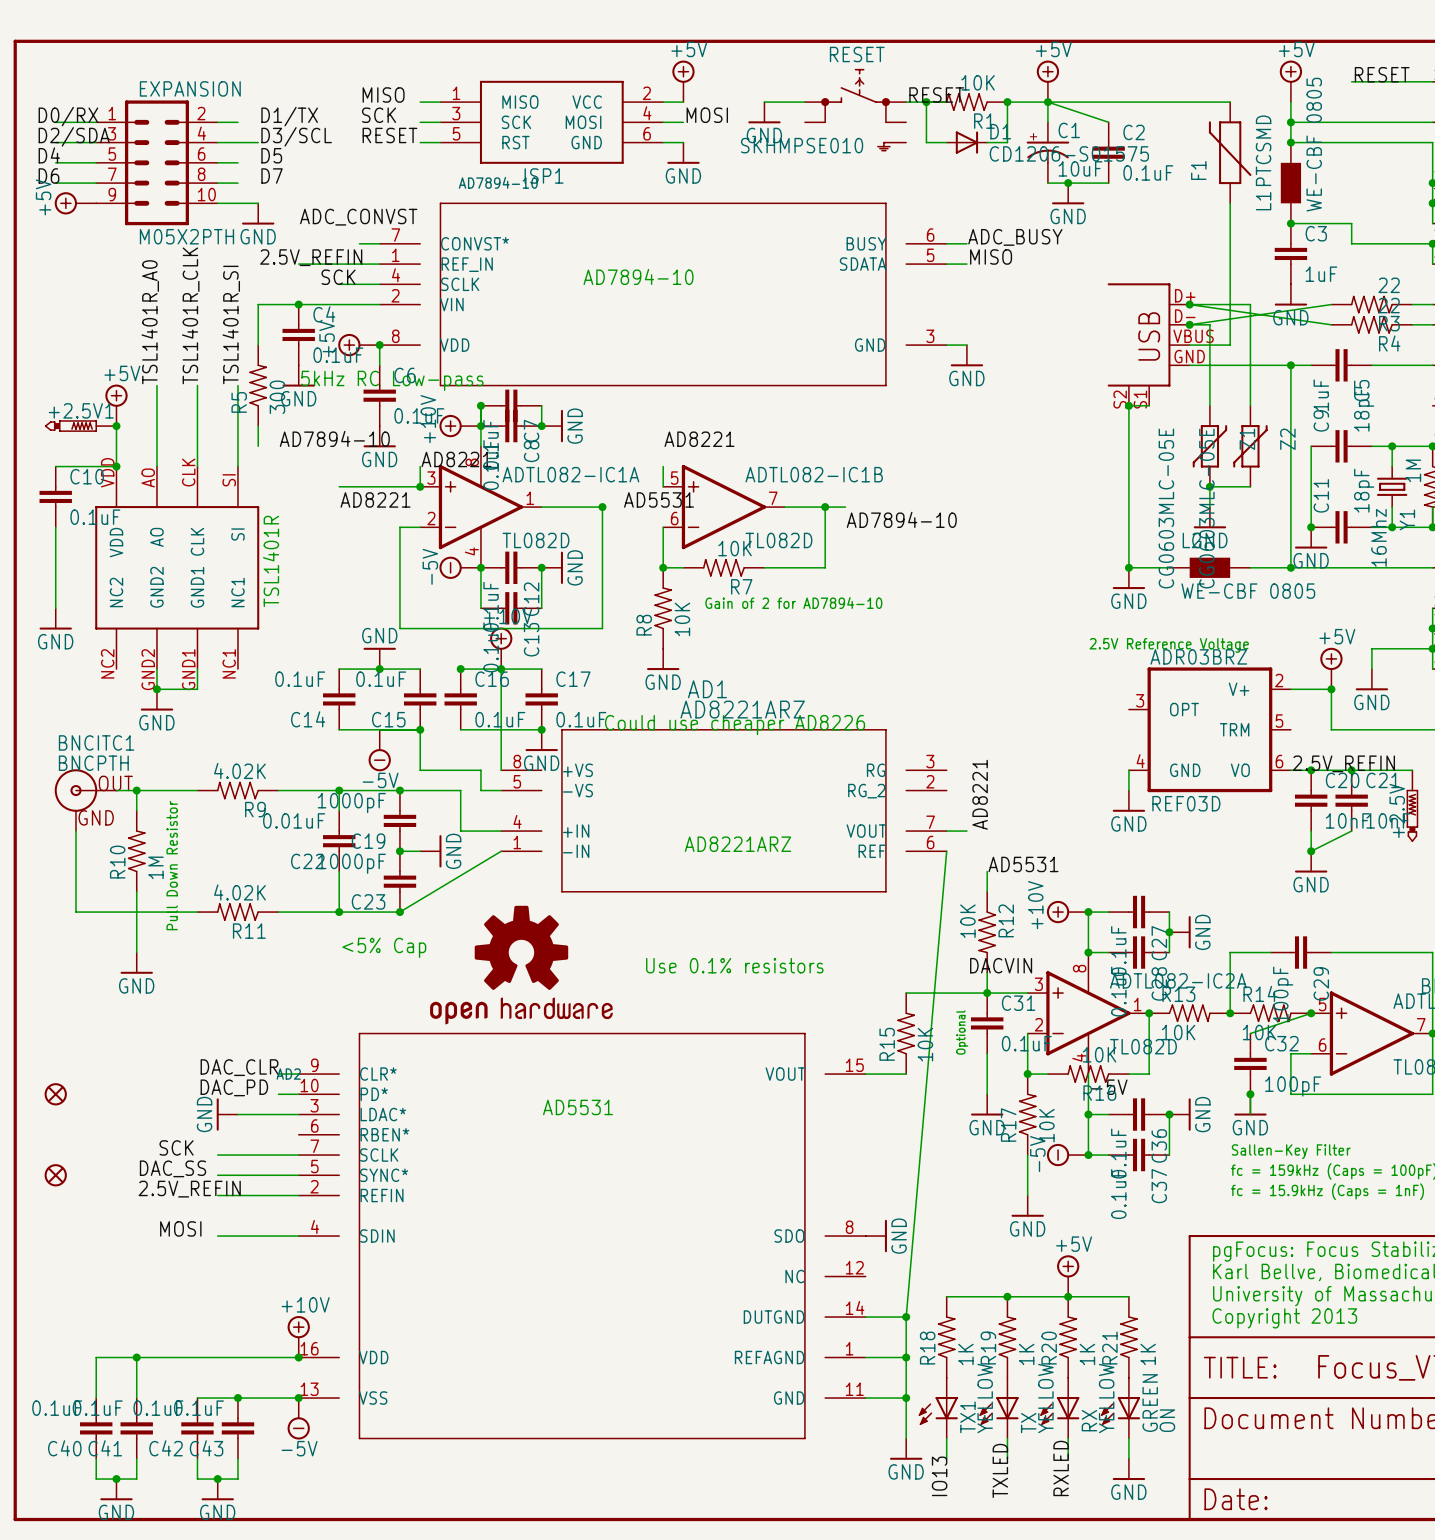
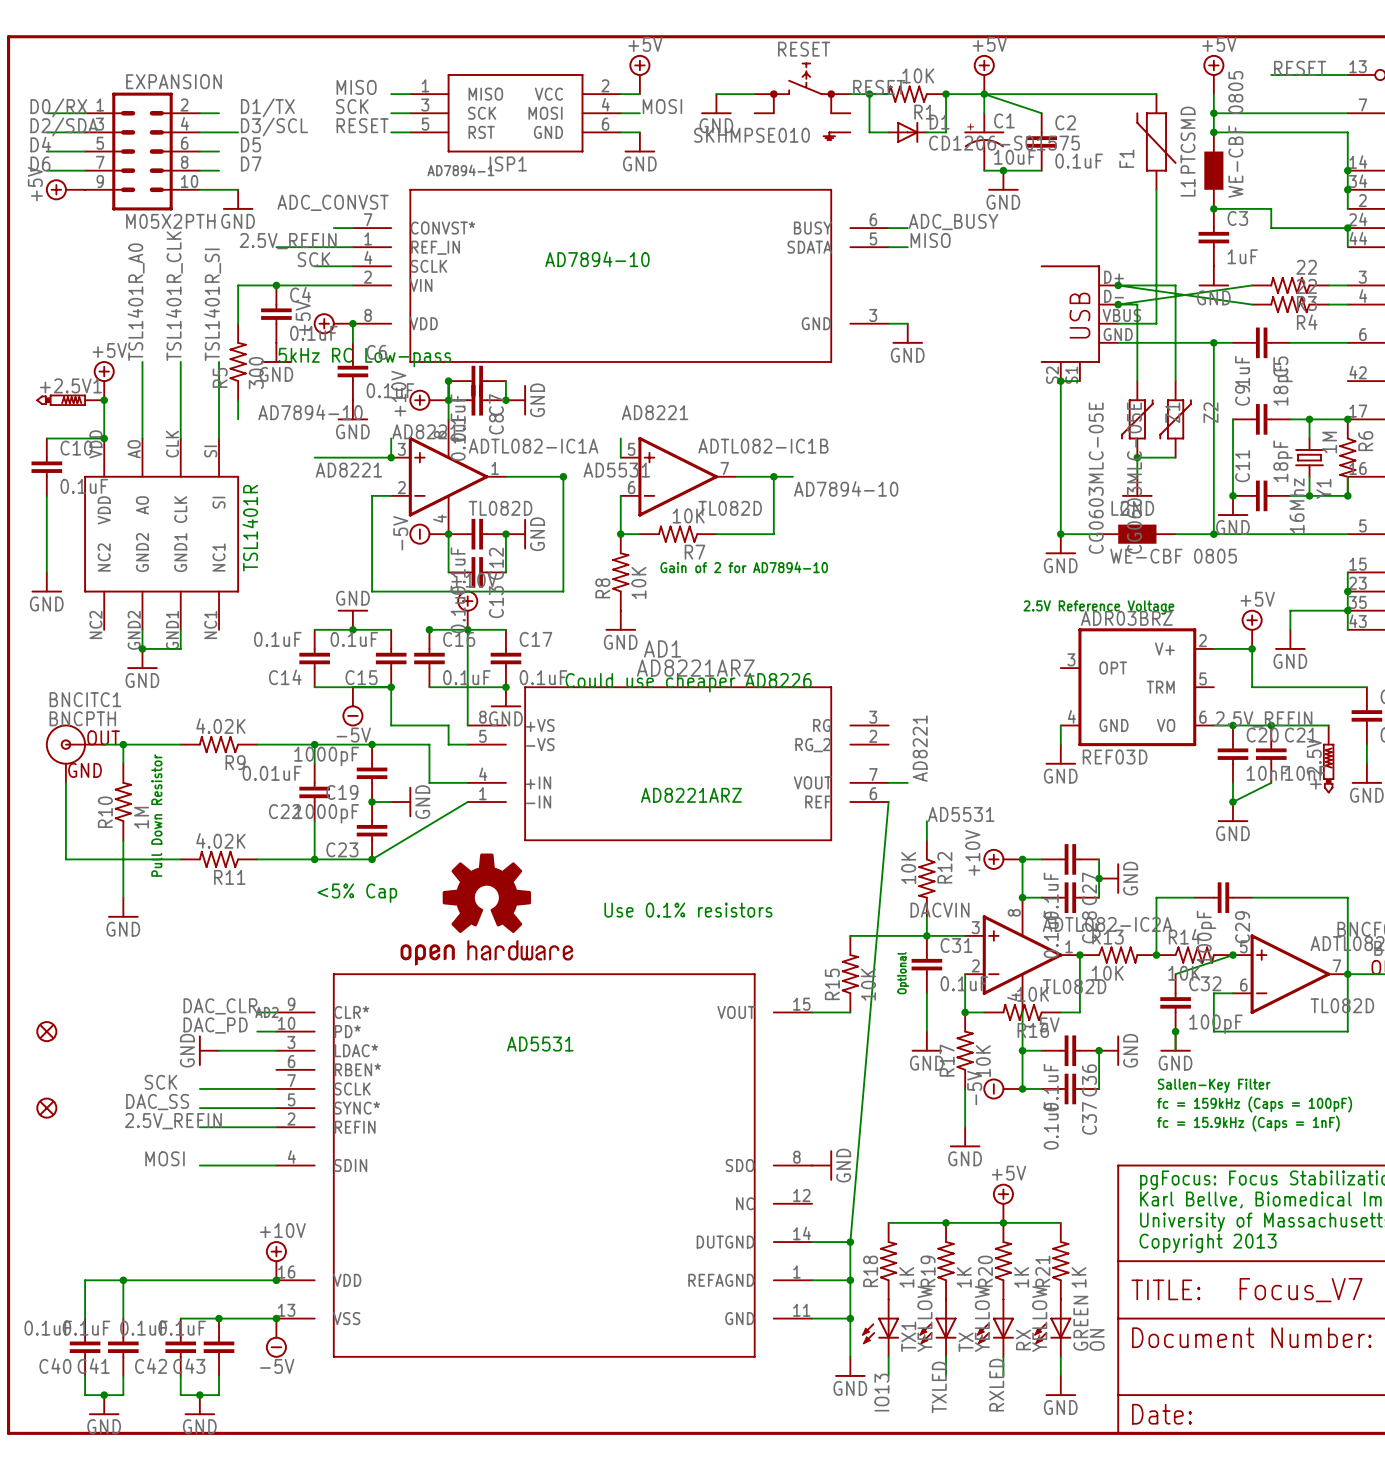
AD7894-10 name: AD7894-10 (498, 182) -> AD7894-1 (460, 170)

